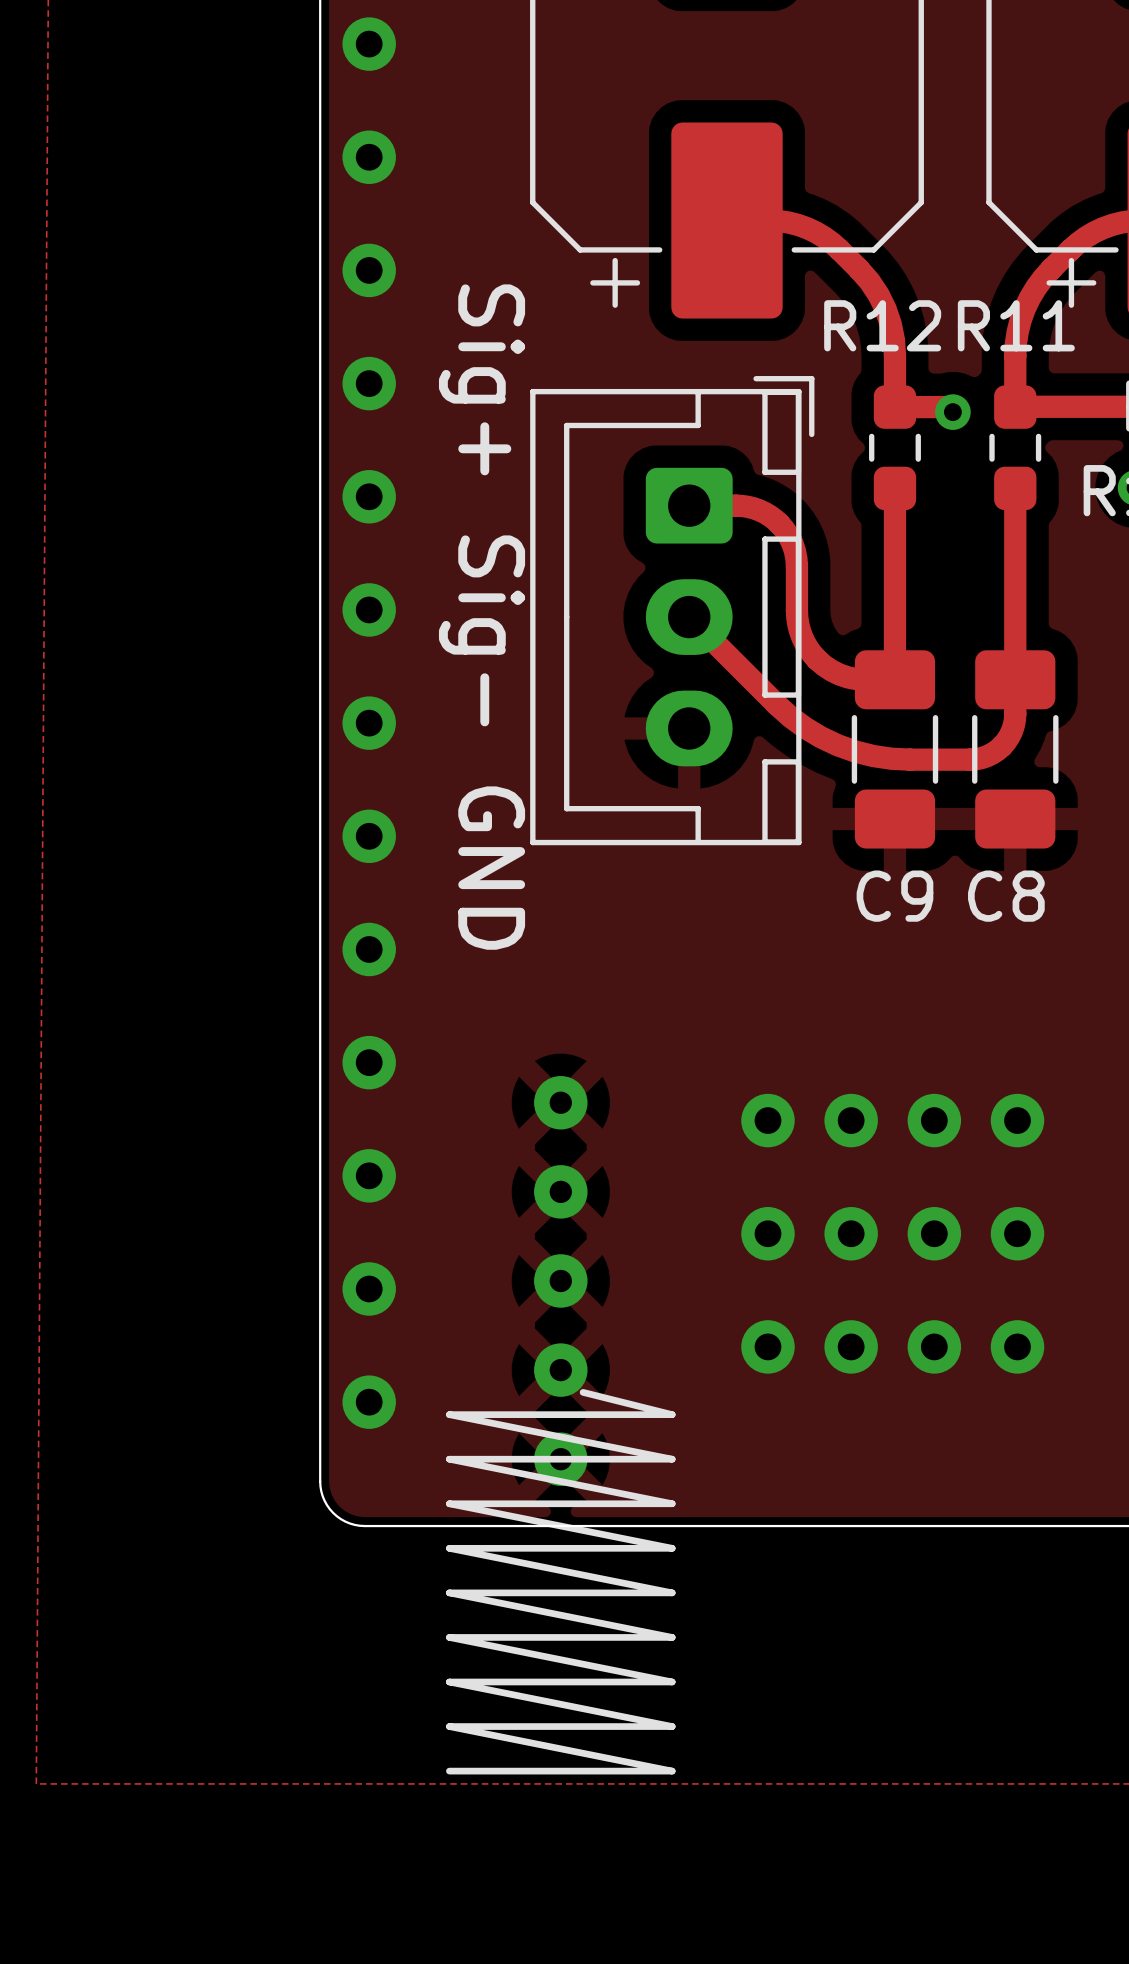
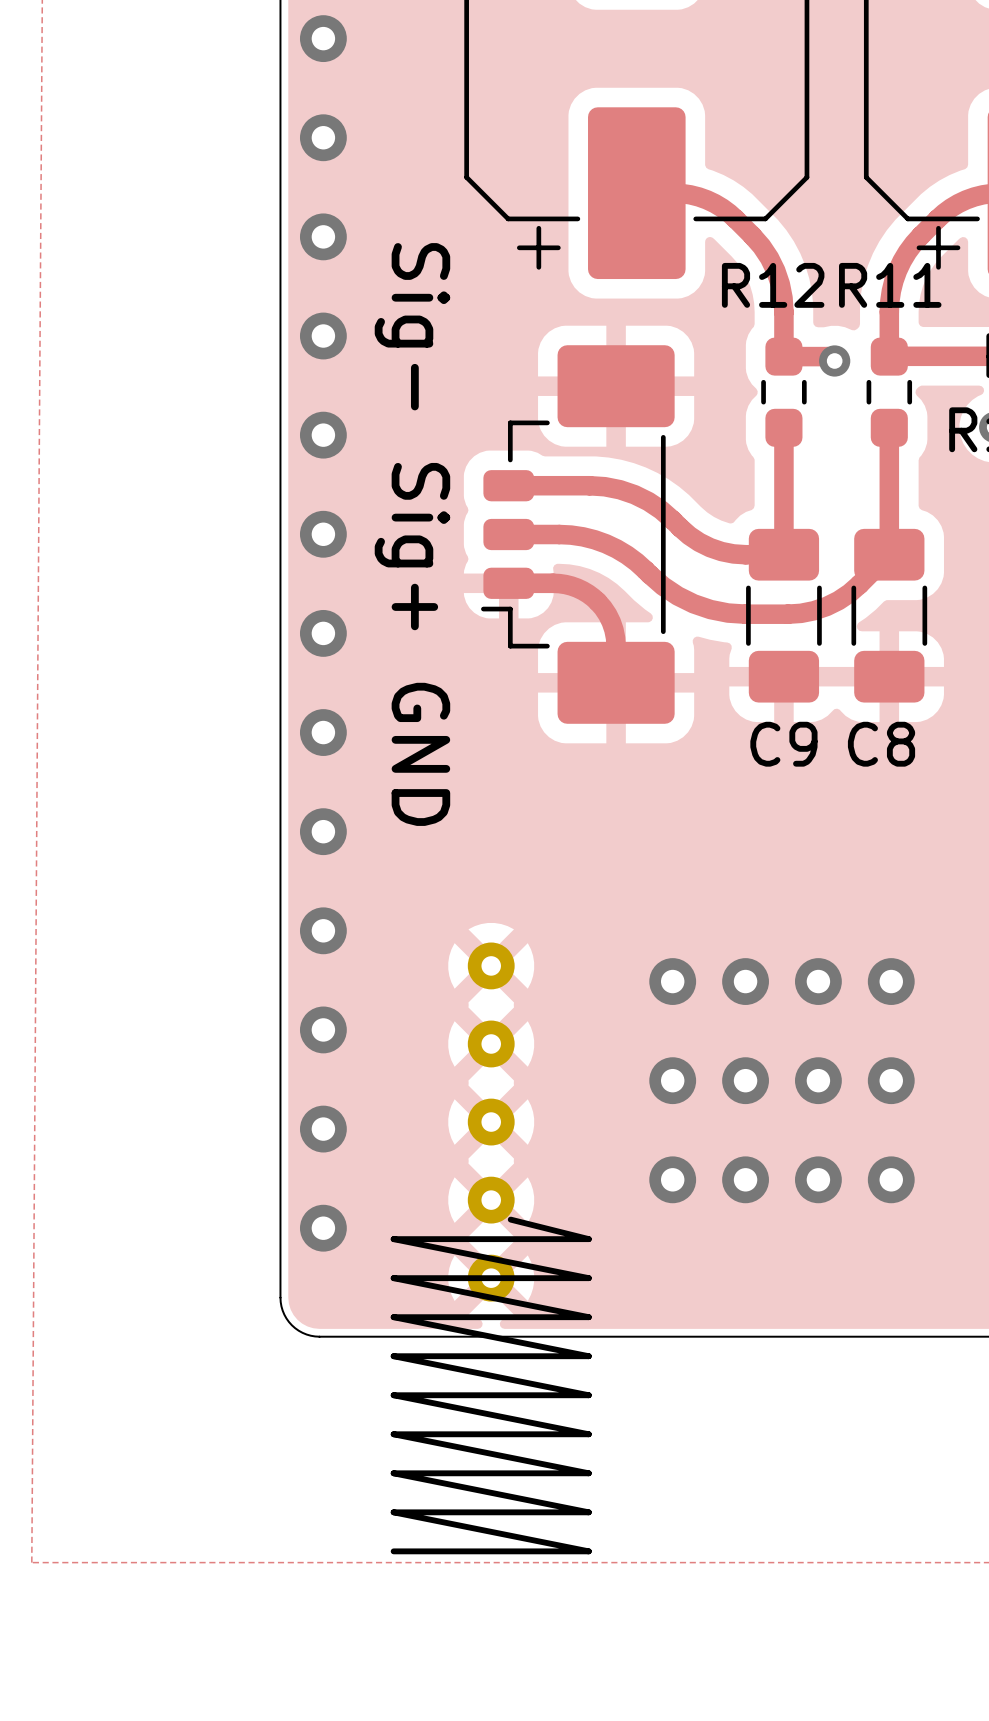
part footprint: [530, 376, 815, 846] -> [481, 345, 675, 724]
track: (689, 505) (747, 506) (769, 515) (784, 529) (792, 543) (796, 558) (796, 610) (799, 630) (812, 654) (831, 670) (856, 679) (894, 679) (894, 633) -> (508, 485) (589, 485) (619, 489) (648, 501) (661, 510) (689, 535) (710, 547) (733, 553) (783, 554)
text: Sig+ Sig- GND (482, 617) -> Sig- Sig+ GND (412, 534)
track: (689, 617) (776, 704) (805, 727) (821, 737) (855, 751) (891, 758) (975, 759) (992, 753) (1001, 746) (1009, 736) (1014, 719) (1015, 633) -> (508, 534) (571, 535) (594, 539) (626, 555) (662, 586) (693, 603) (728, 613) (745, 614) (801, 613) (826, 606) (849, 593) (889, 554)
track: none -> (508, 583) (565, 584) (582, 590) (597, 601) (607, 614) (613, 629) (616, 682)
C9 position: (894, 749) -> (783, 615)
C8 position: (1015, 749) -> (889, 615)

